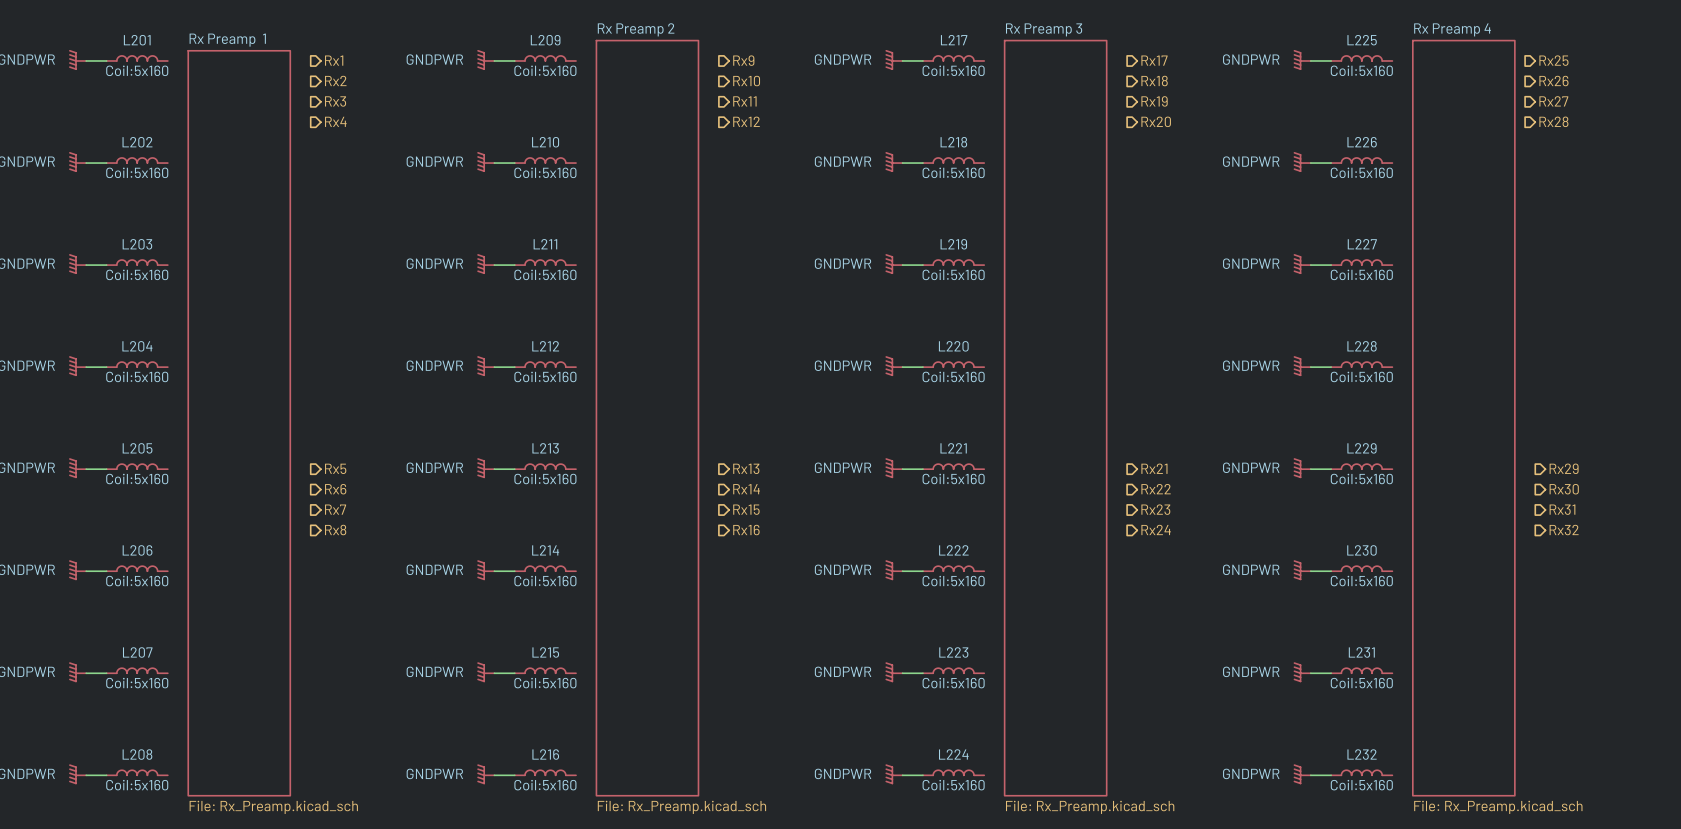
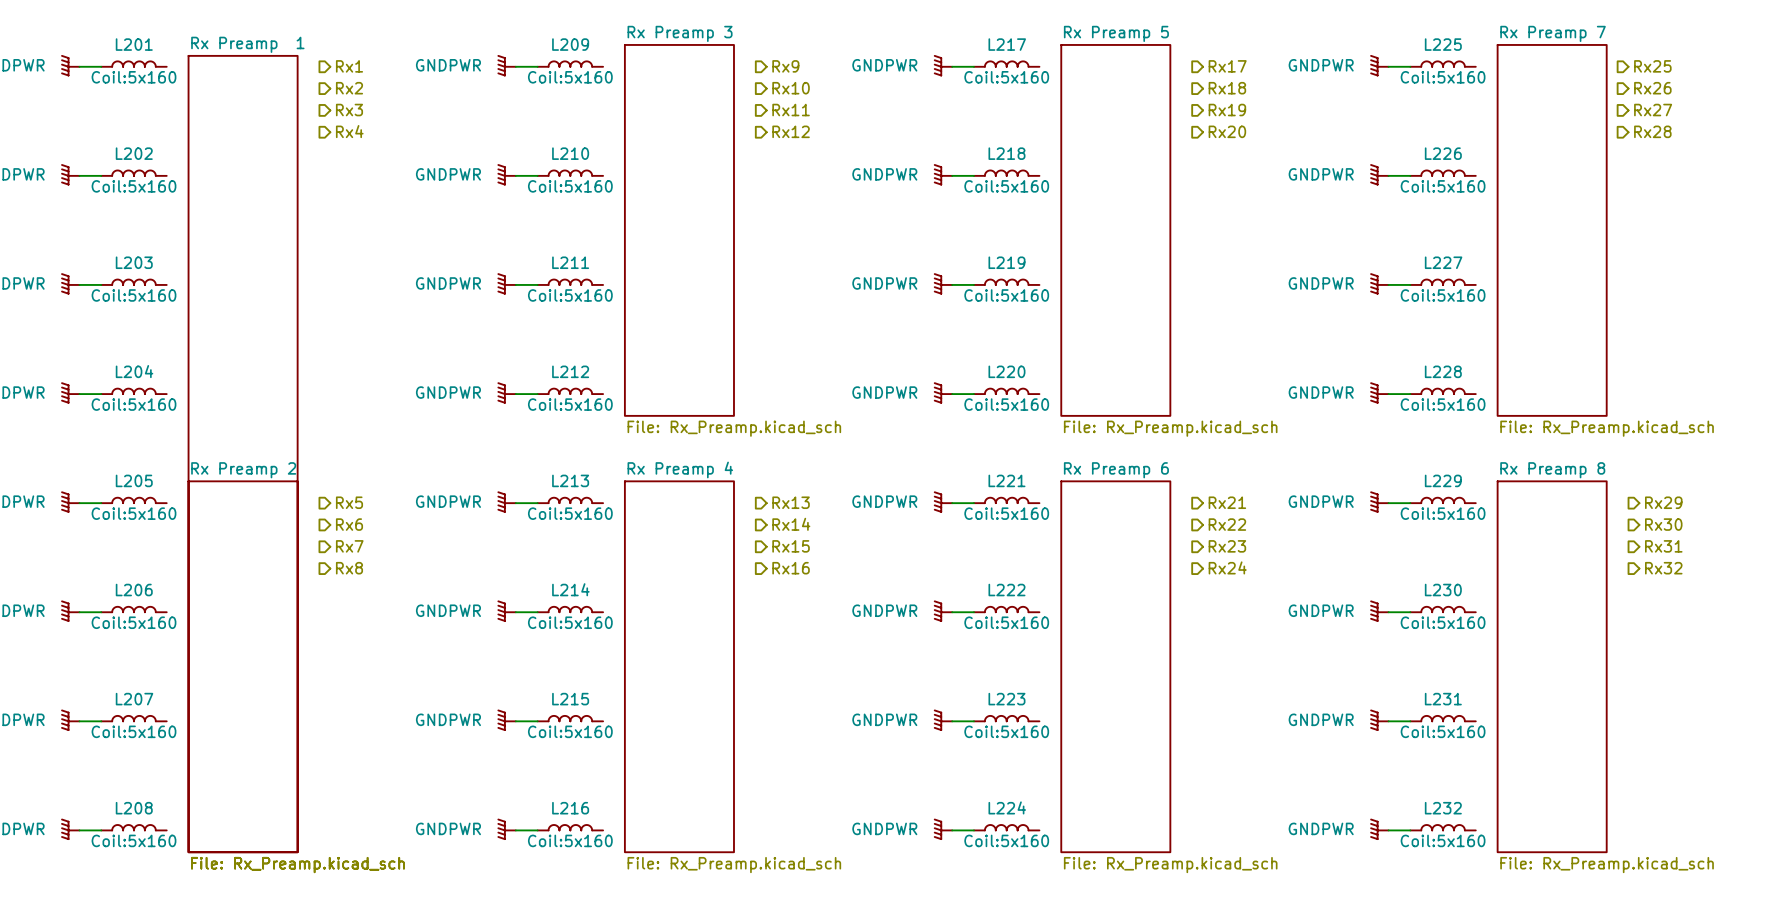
sheet Rx Preamp 2 name position: Rx Preamp 2 (636, 29) -> Rx Preamp 2 (243, 470)
sheet Rx Preamp 3 name position: Rx Preamp 3 (1044, 29) -> Rx Preamp 3 (680, 33)
sheet Rx Preamp 4 name position: Rx Preamp 4 (1452, 29) -> Rx Preamp 4 (680, 469)
sheet Rx Preamp 2 shape: [595, 39, 700, 797] -> [187, 480, 299, 853]
sheet Rx Preamp 3 shape: [1004, 39, 1108, 797] -> [624, 44, 735, 417]
sheet Rx Preamp 4 shape: [1412, 39, 1516, 797] -> [624, 480, 735, 853]
sheet Rx Preamp 5: none -> File: Rx_Preamp.kicad_sch (1115, 230)
sheet Rx Preamp 7: none -> File: Rx_Preamp.kicad_sch (1552, 230)
sheet Rx Preamp 6: none -> File: Rx_Preamp.kicad_sch (1115, 666)
sheet Rx Preamp 8: none -> File: Rx_Preamp.kicad_sch (1552, 666)
sheet Rx Preamp 2 value position: File: Rx_Preamp.kicad_sch (681, 807) -> File: Rx_Preamp.kicad_sch (297, 865)
sheet Rx Preamp 3 value position: File: Rx_Preamp.kicad_sch (1090, 807) -> File: Rx_Preamp.kicad_sch (734, 428)

